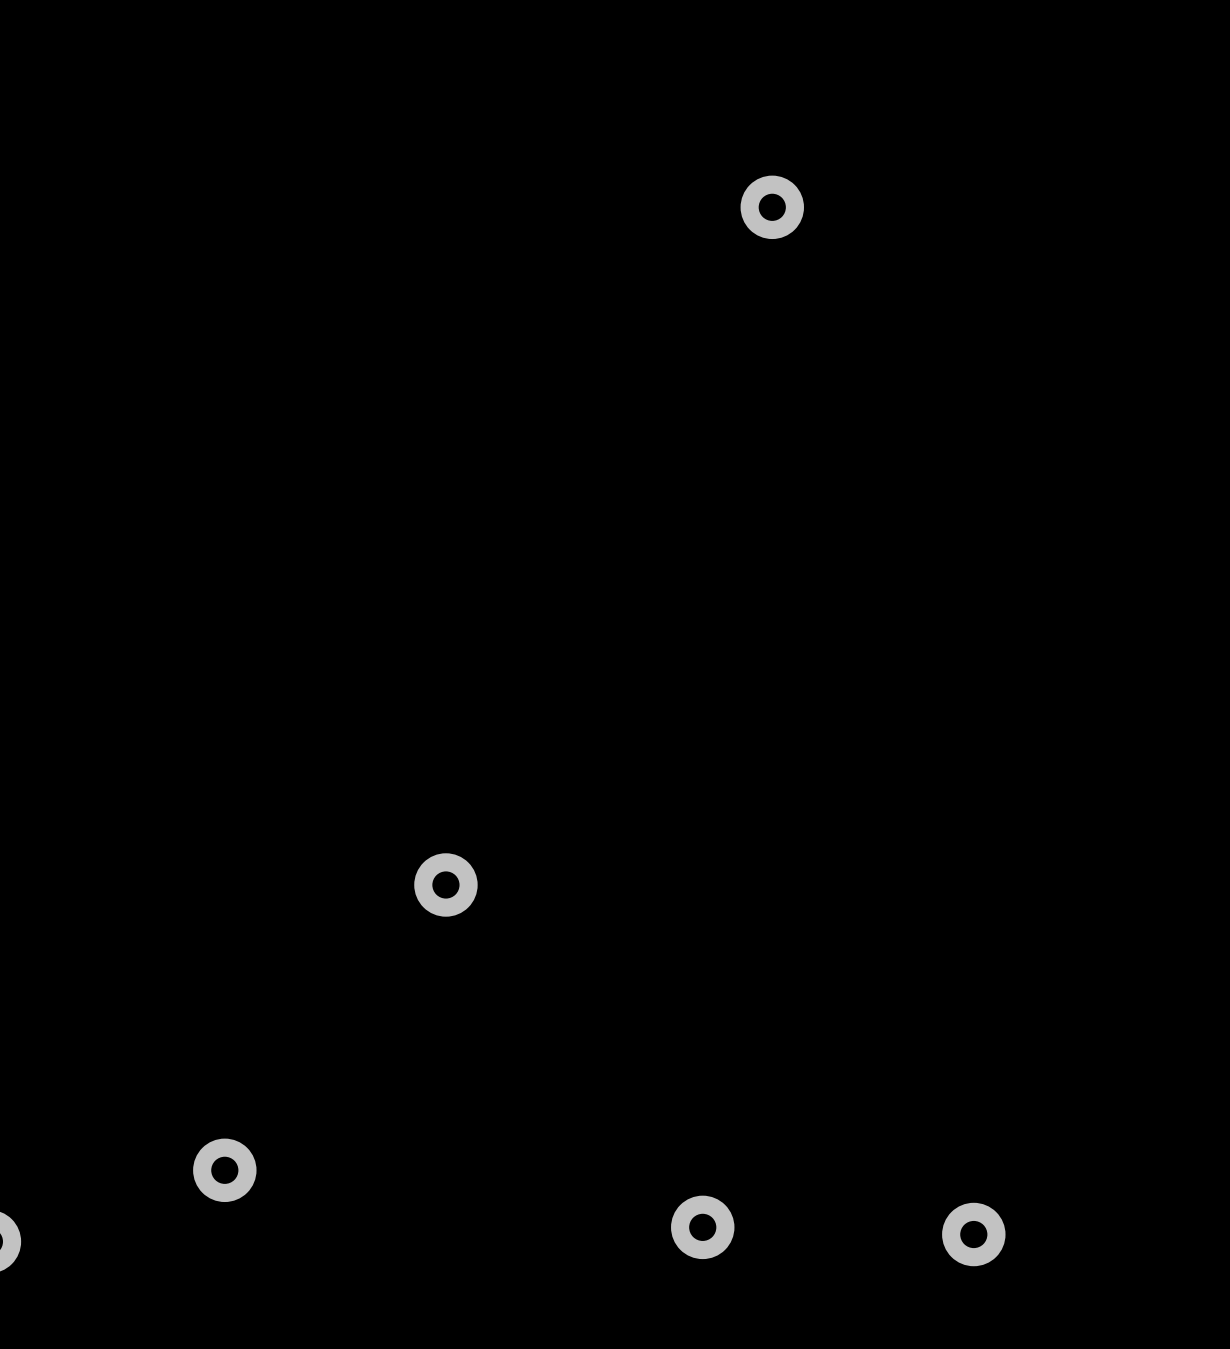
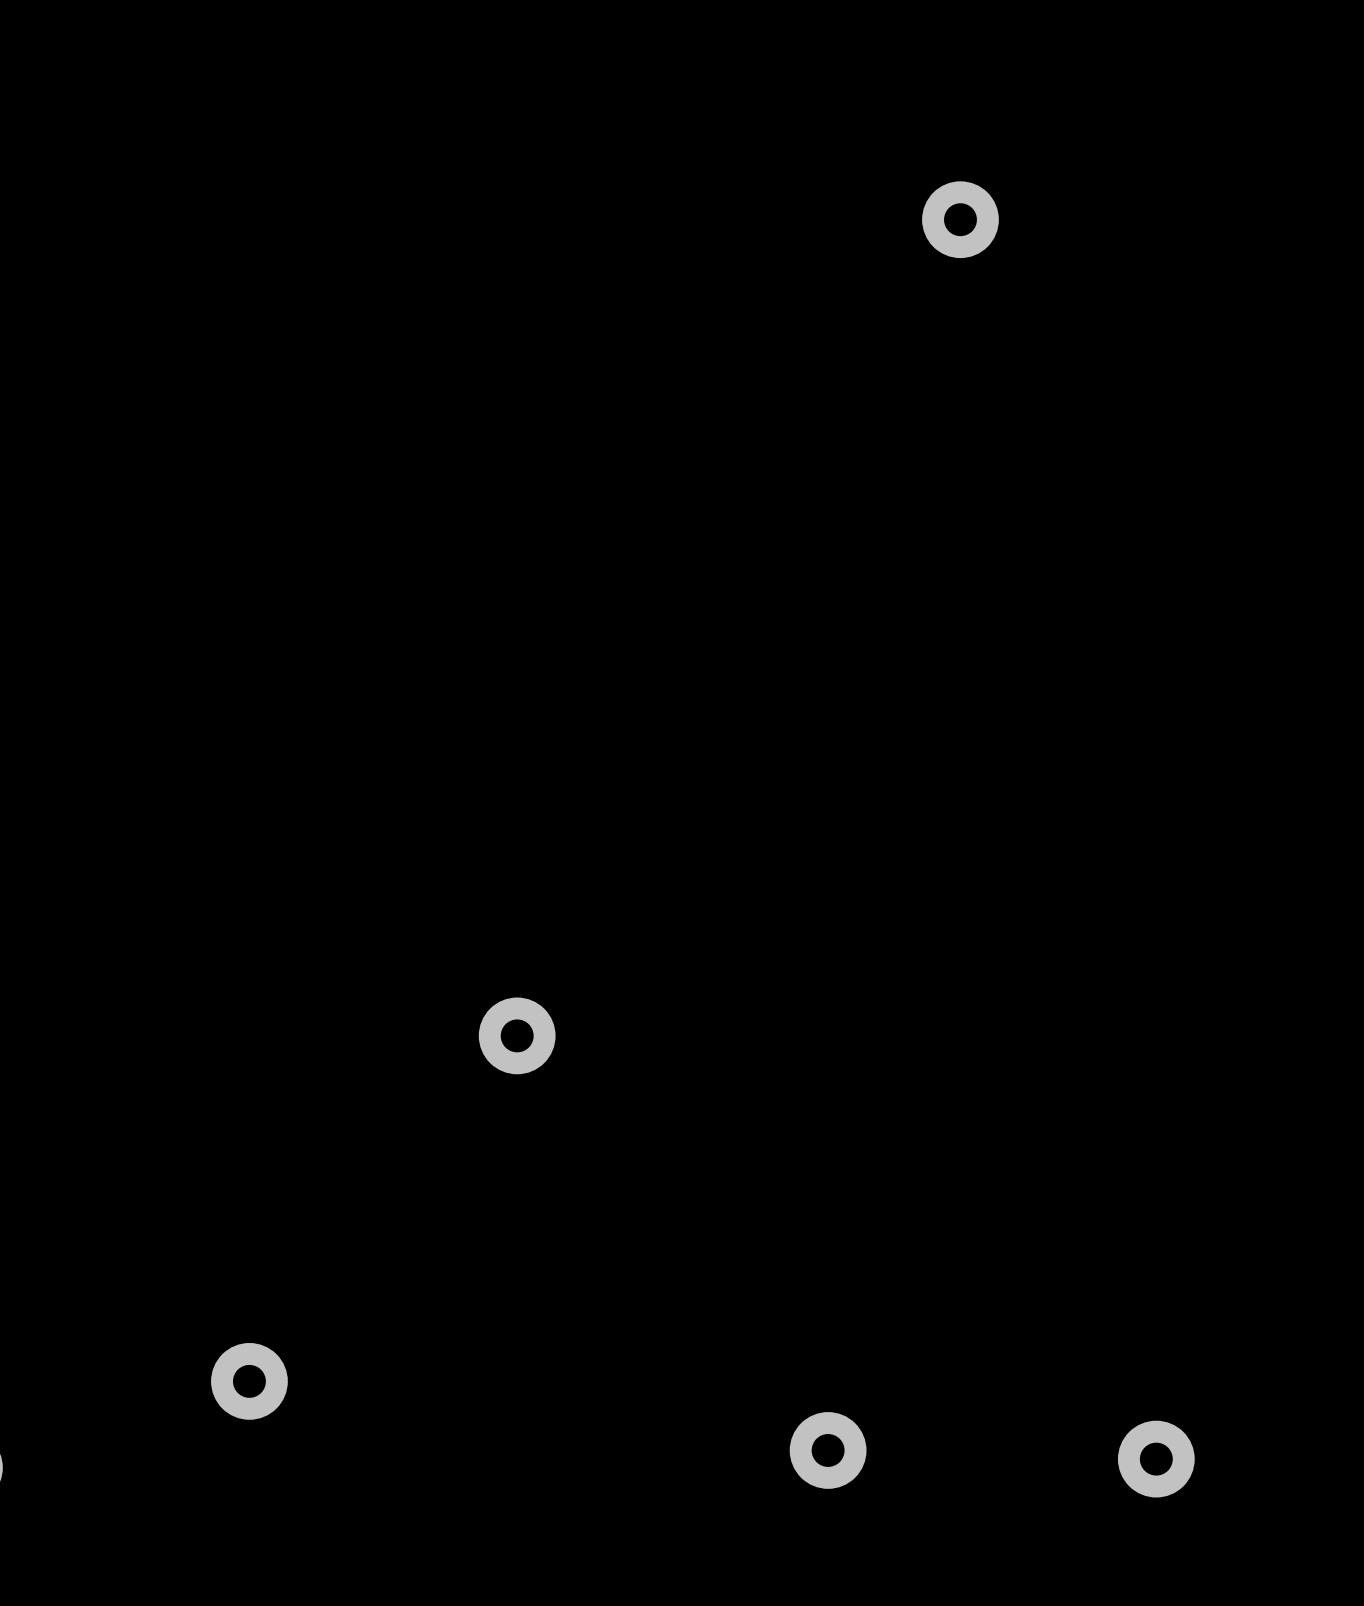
via position: (772, 207) -> (960, 219)

